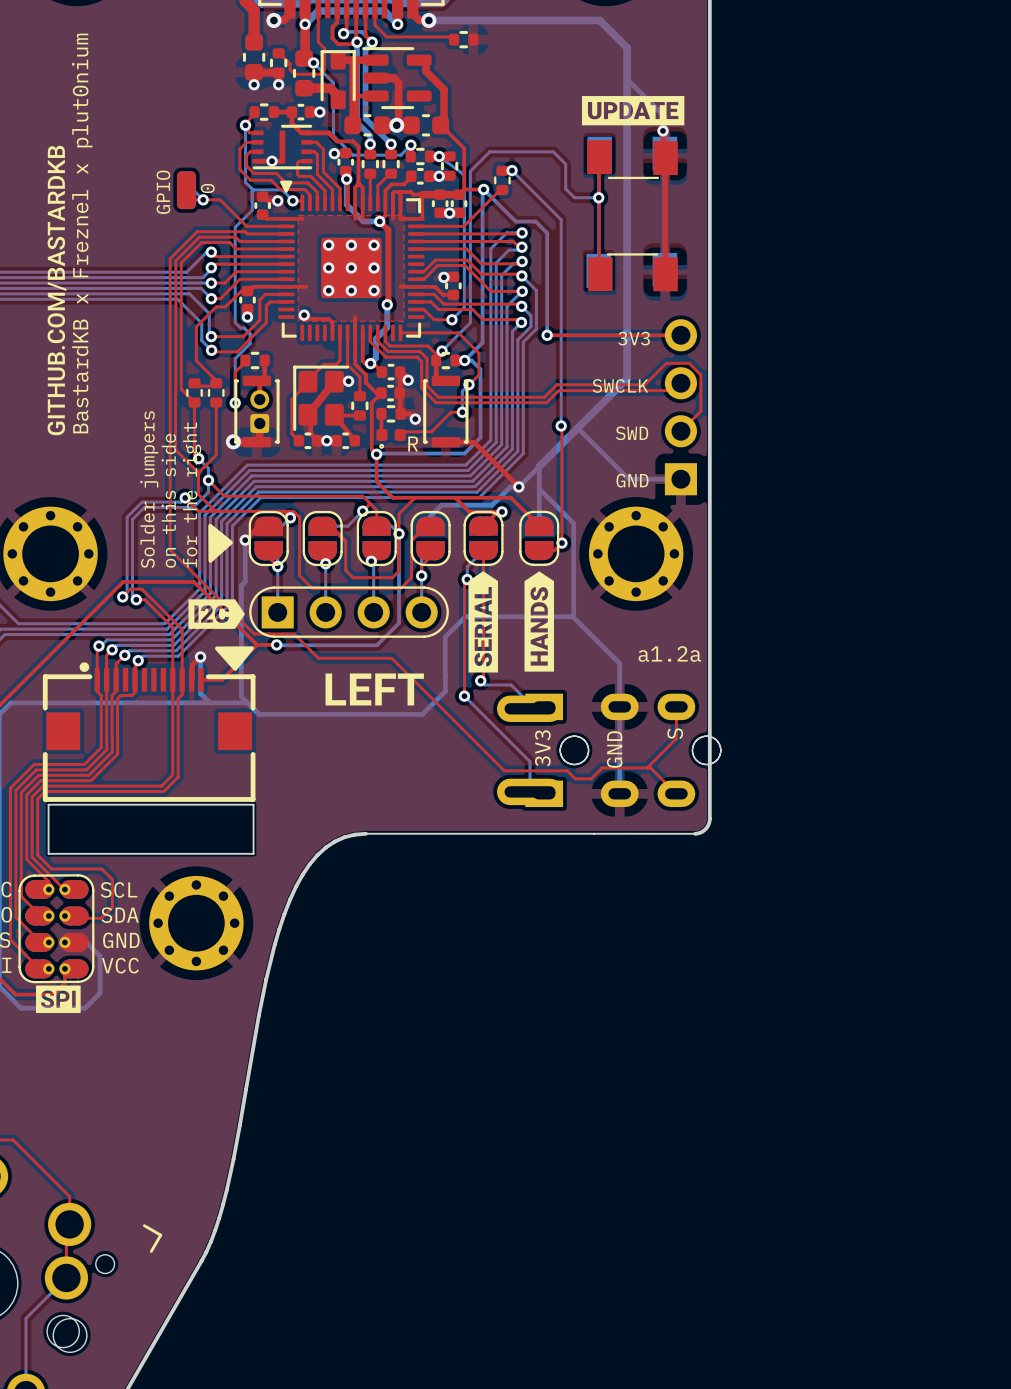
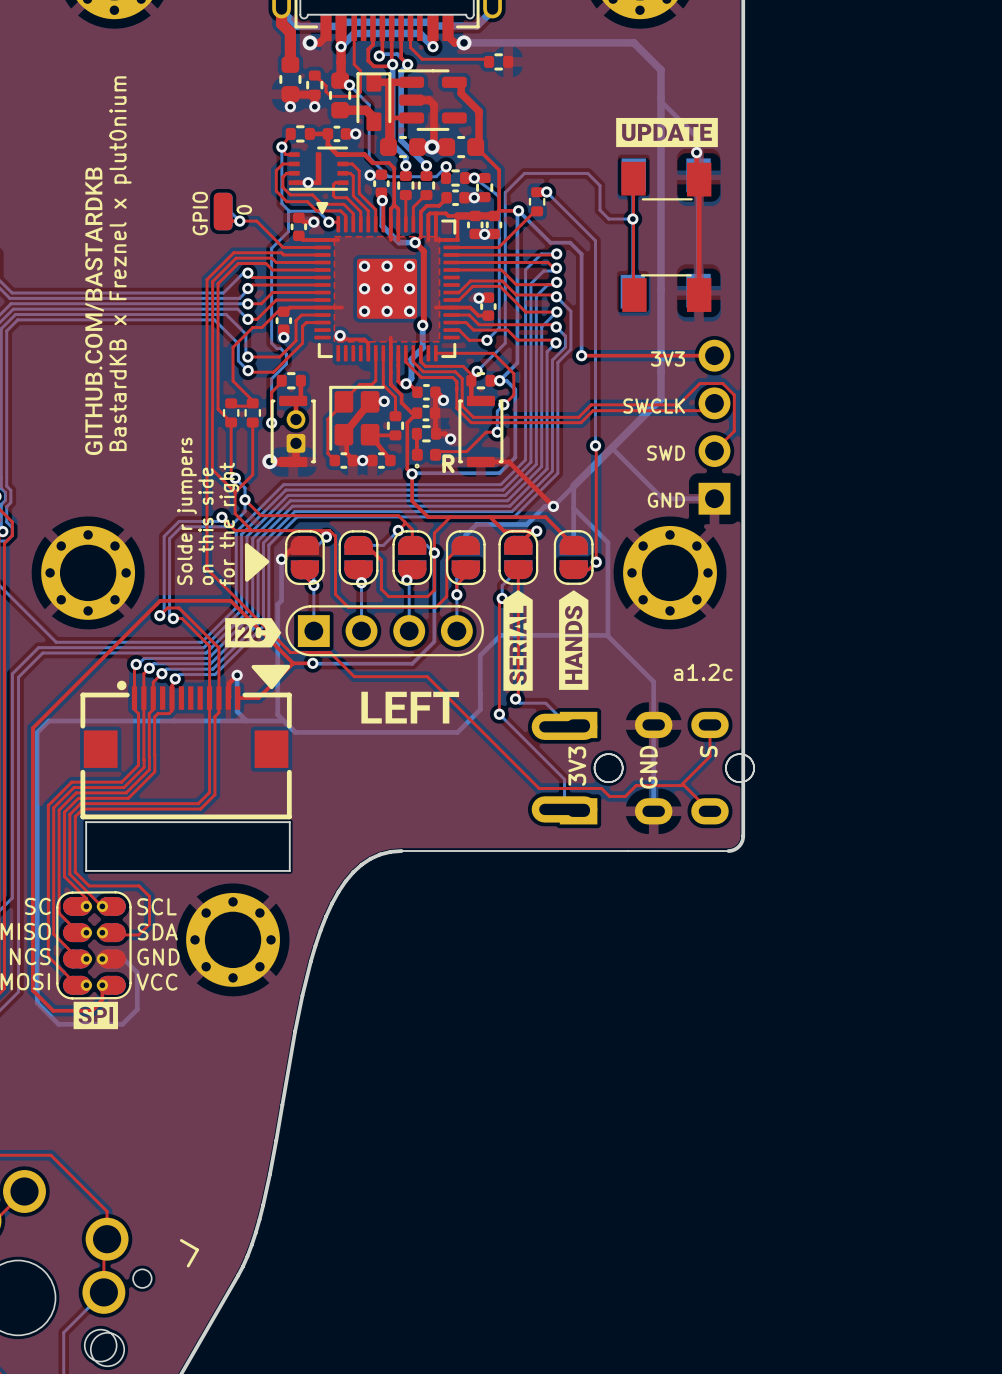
text: a1.2a (669, 653) -> a1.2c (703, 672)

